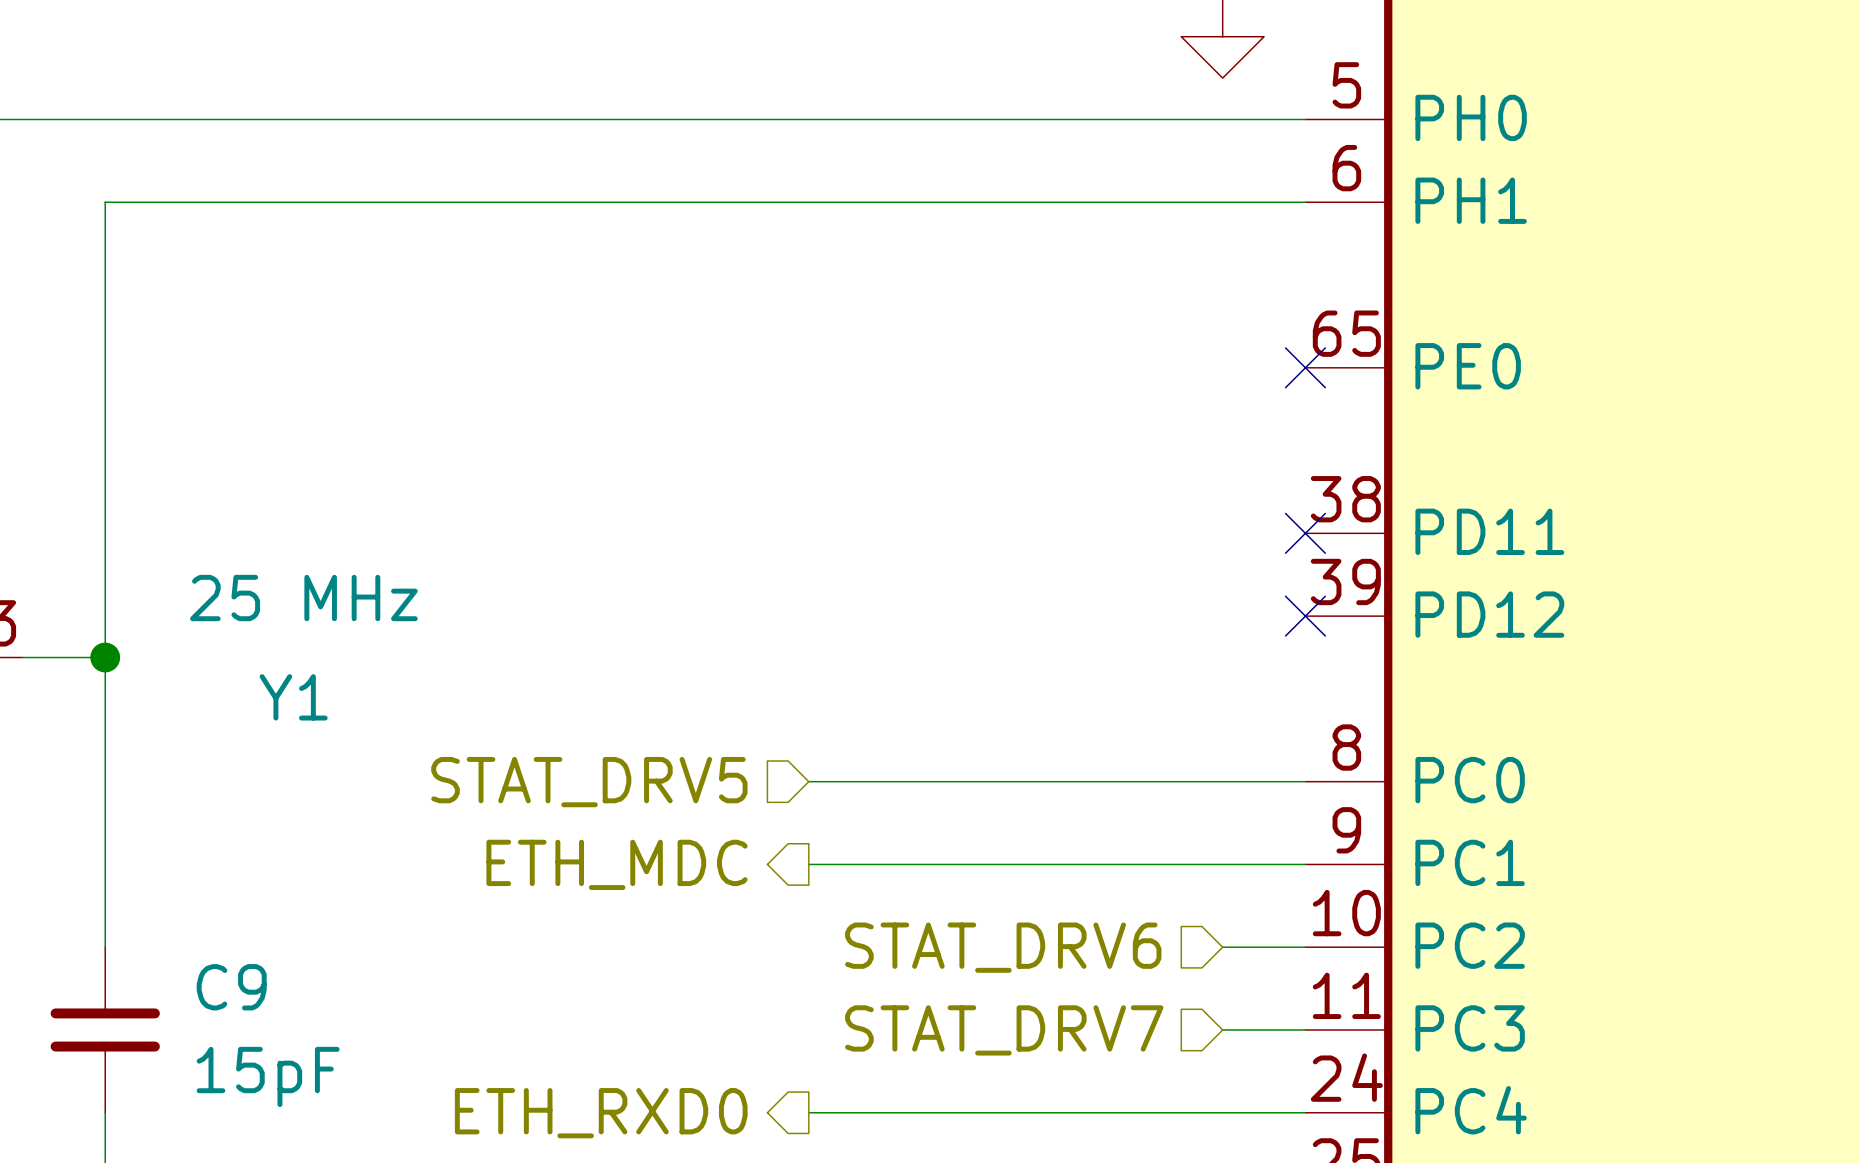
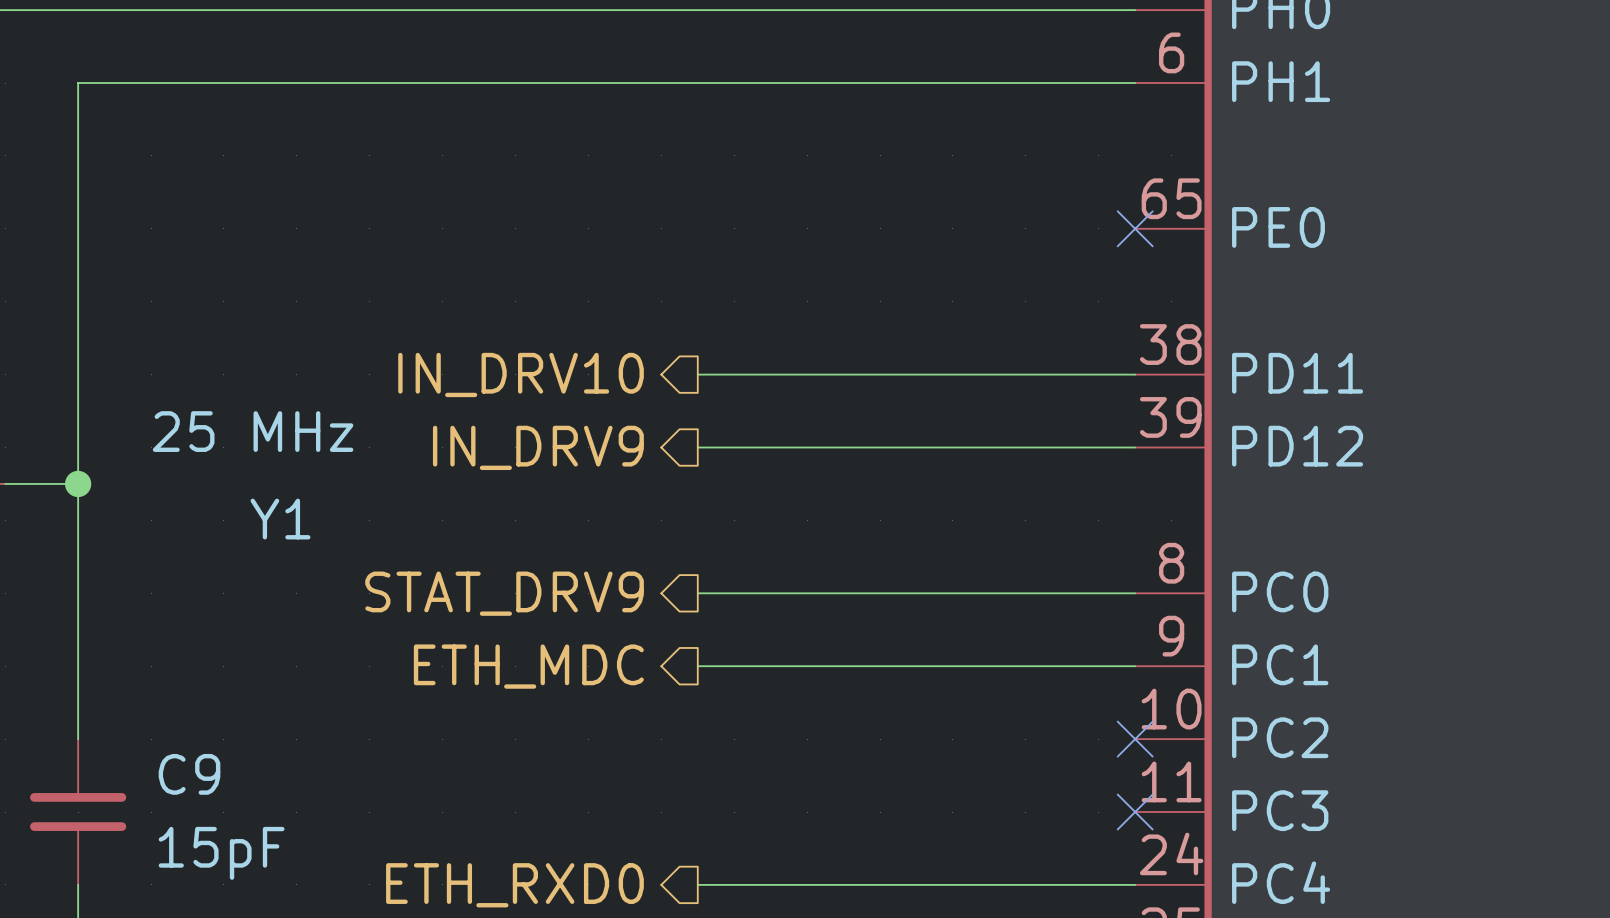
hierarchical label: none -> IN_DRV10 (521, 374)
wire: none -> (697, 374) (1135, 374)
no-connect mark: (1305, 533) -> none
hierarchical label: none -> IN_DRV9 (538, 447)
wire: none -> (697, 447) (1135, 447)
no-connect mark: (1305, 616) -> none
Y1 name position: Y1 (293, 697) -> Y1 (280, 519)
hierarchical label shape: input (589, 782) -> output (504, 593)
hierarchical label: STAT_DRV5 (589, 782) -> STAT_DRV9 (504, 593)
hierarchical label: STAT_DRV6 (1003, 947) -> none
wire: (1222, 947) (1305, 947) -> none
no-connect mark: none -> (1135, 739)
wire: (1222, 1029) (1305, 1029) -> none
no-connect mark: none -> (1135, 812)
hierarchical label: STAT_DRV7 (1004, 1030) -> none

